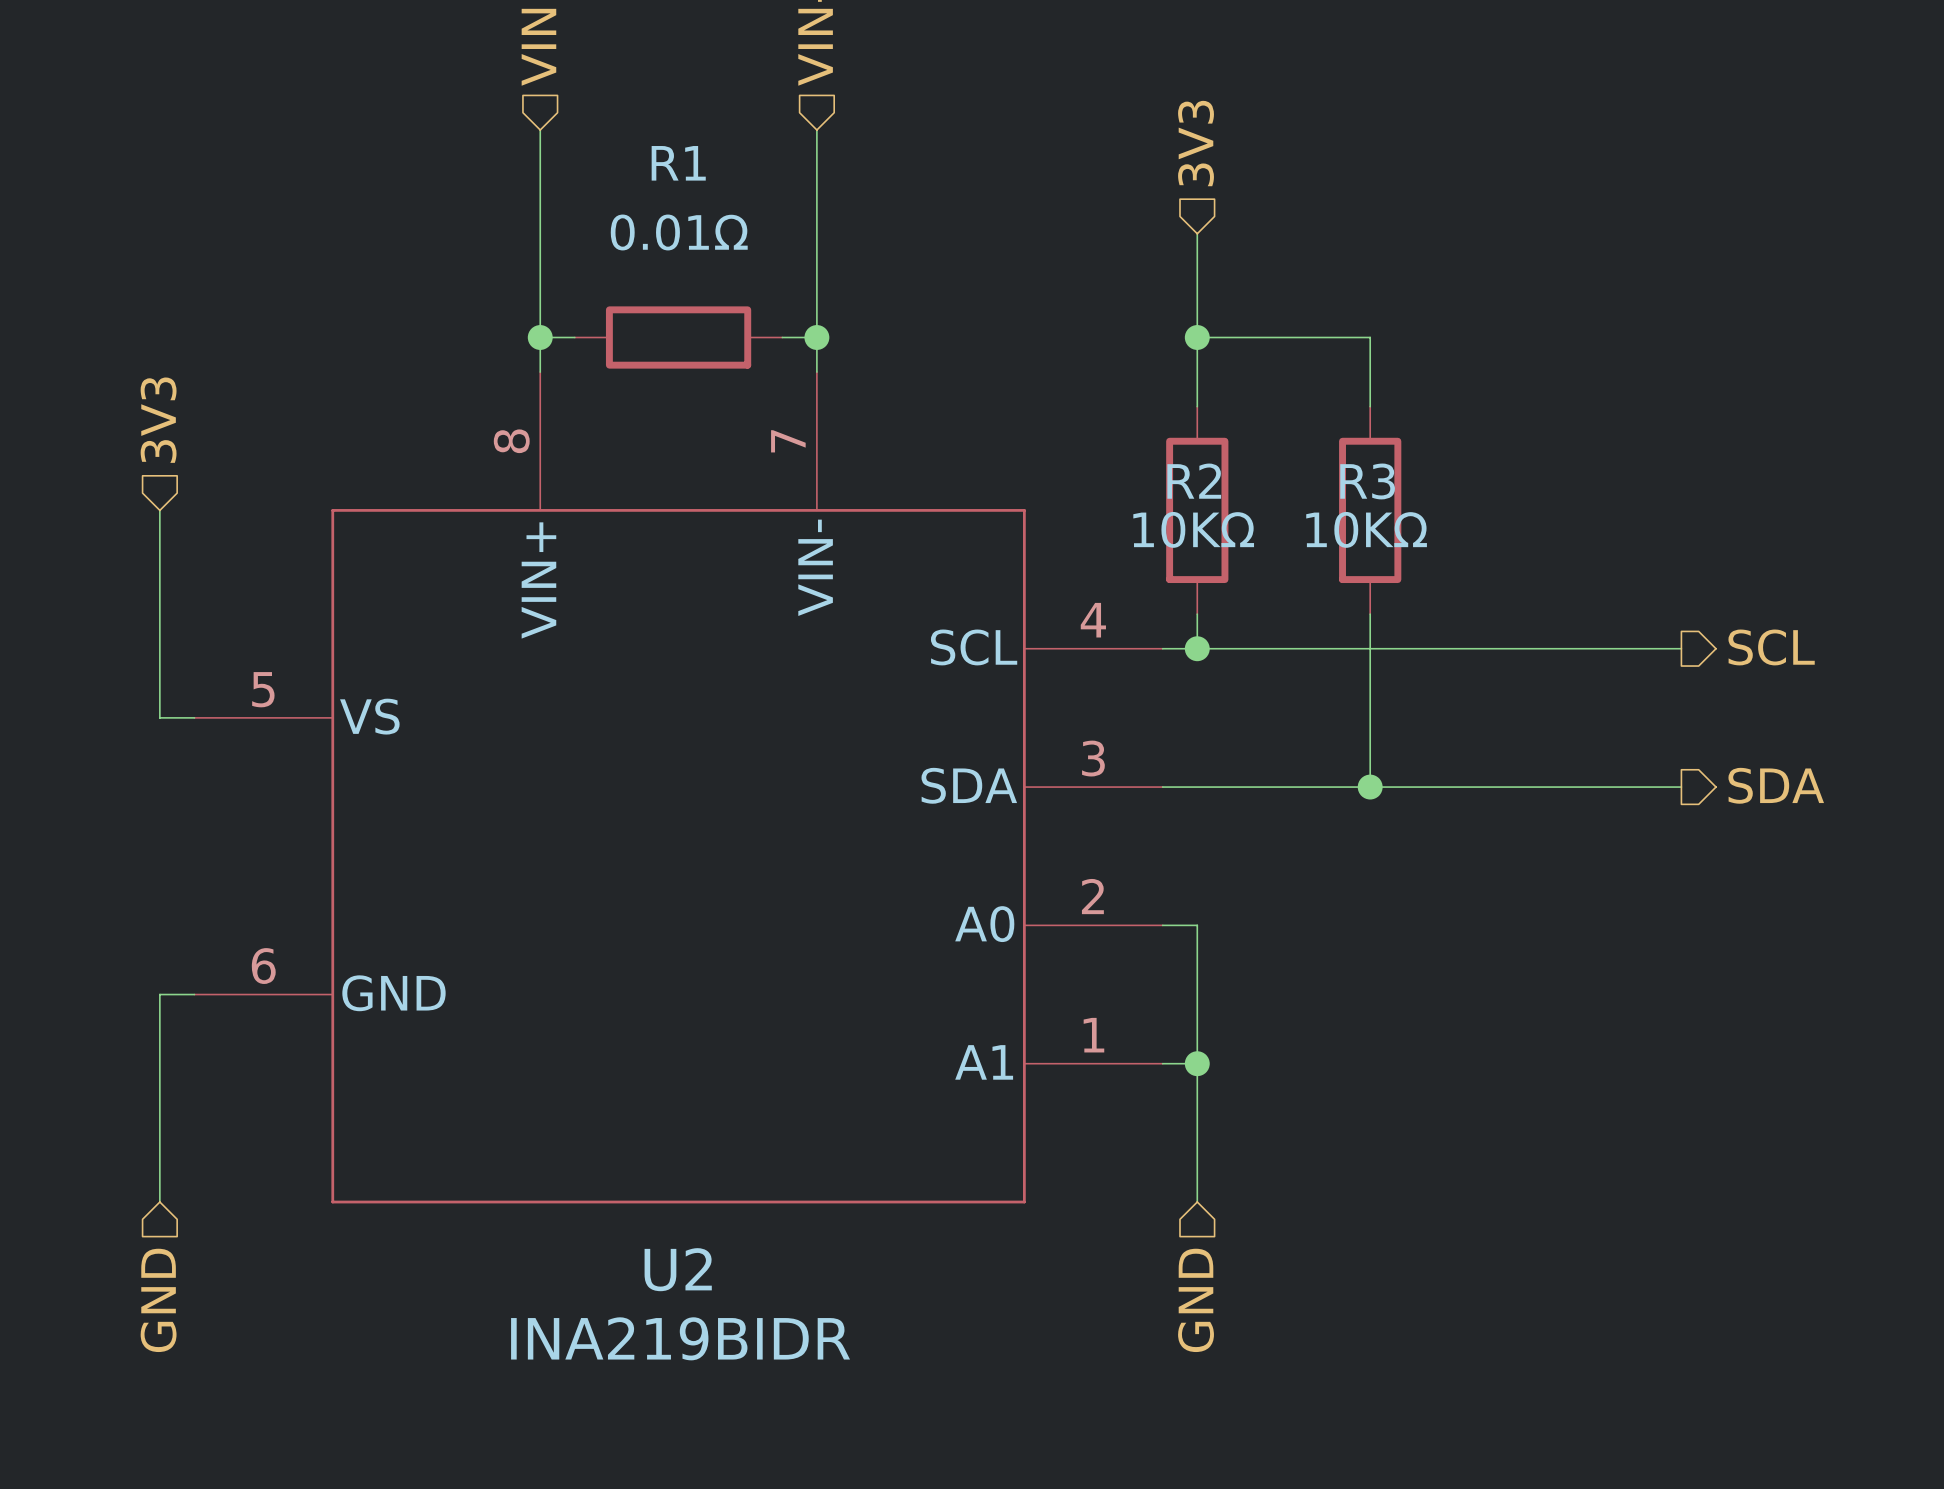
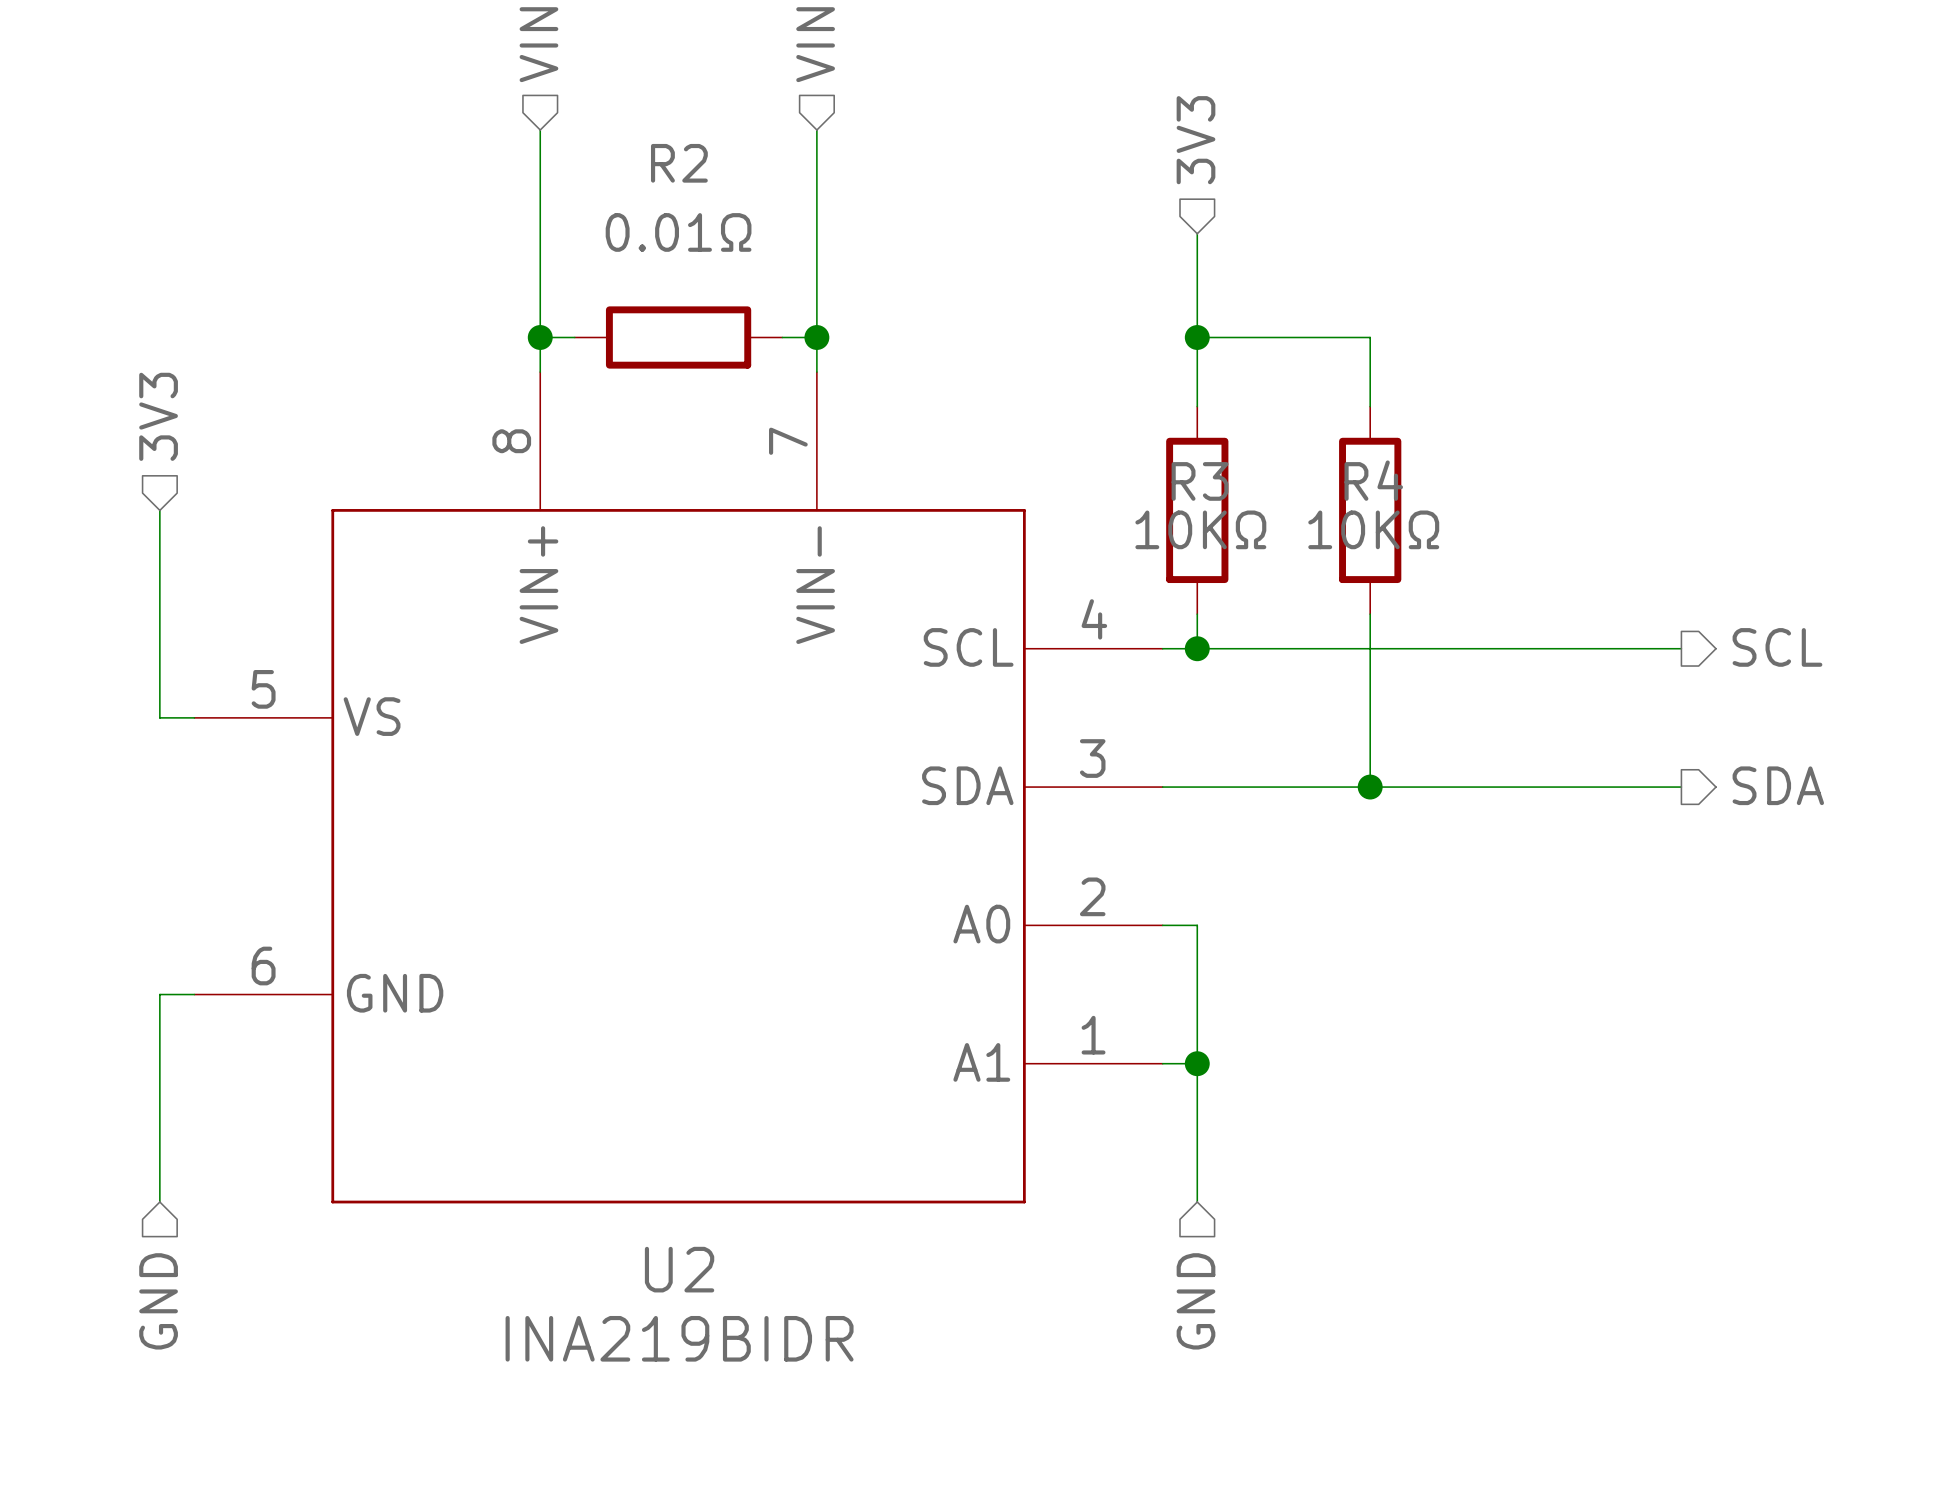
R1 name: R1 (678, 163) -> R2 (679, 163)
R2 name: R2 (1194, 481) -> R3 (1200, 481)
R3 name: R3 (1367, 481) -> R4 (1373, 480)

